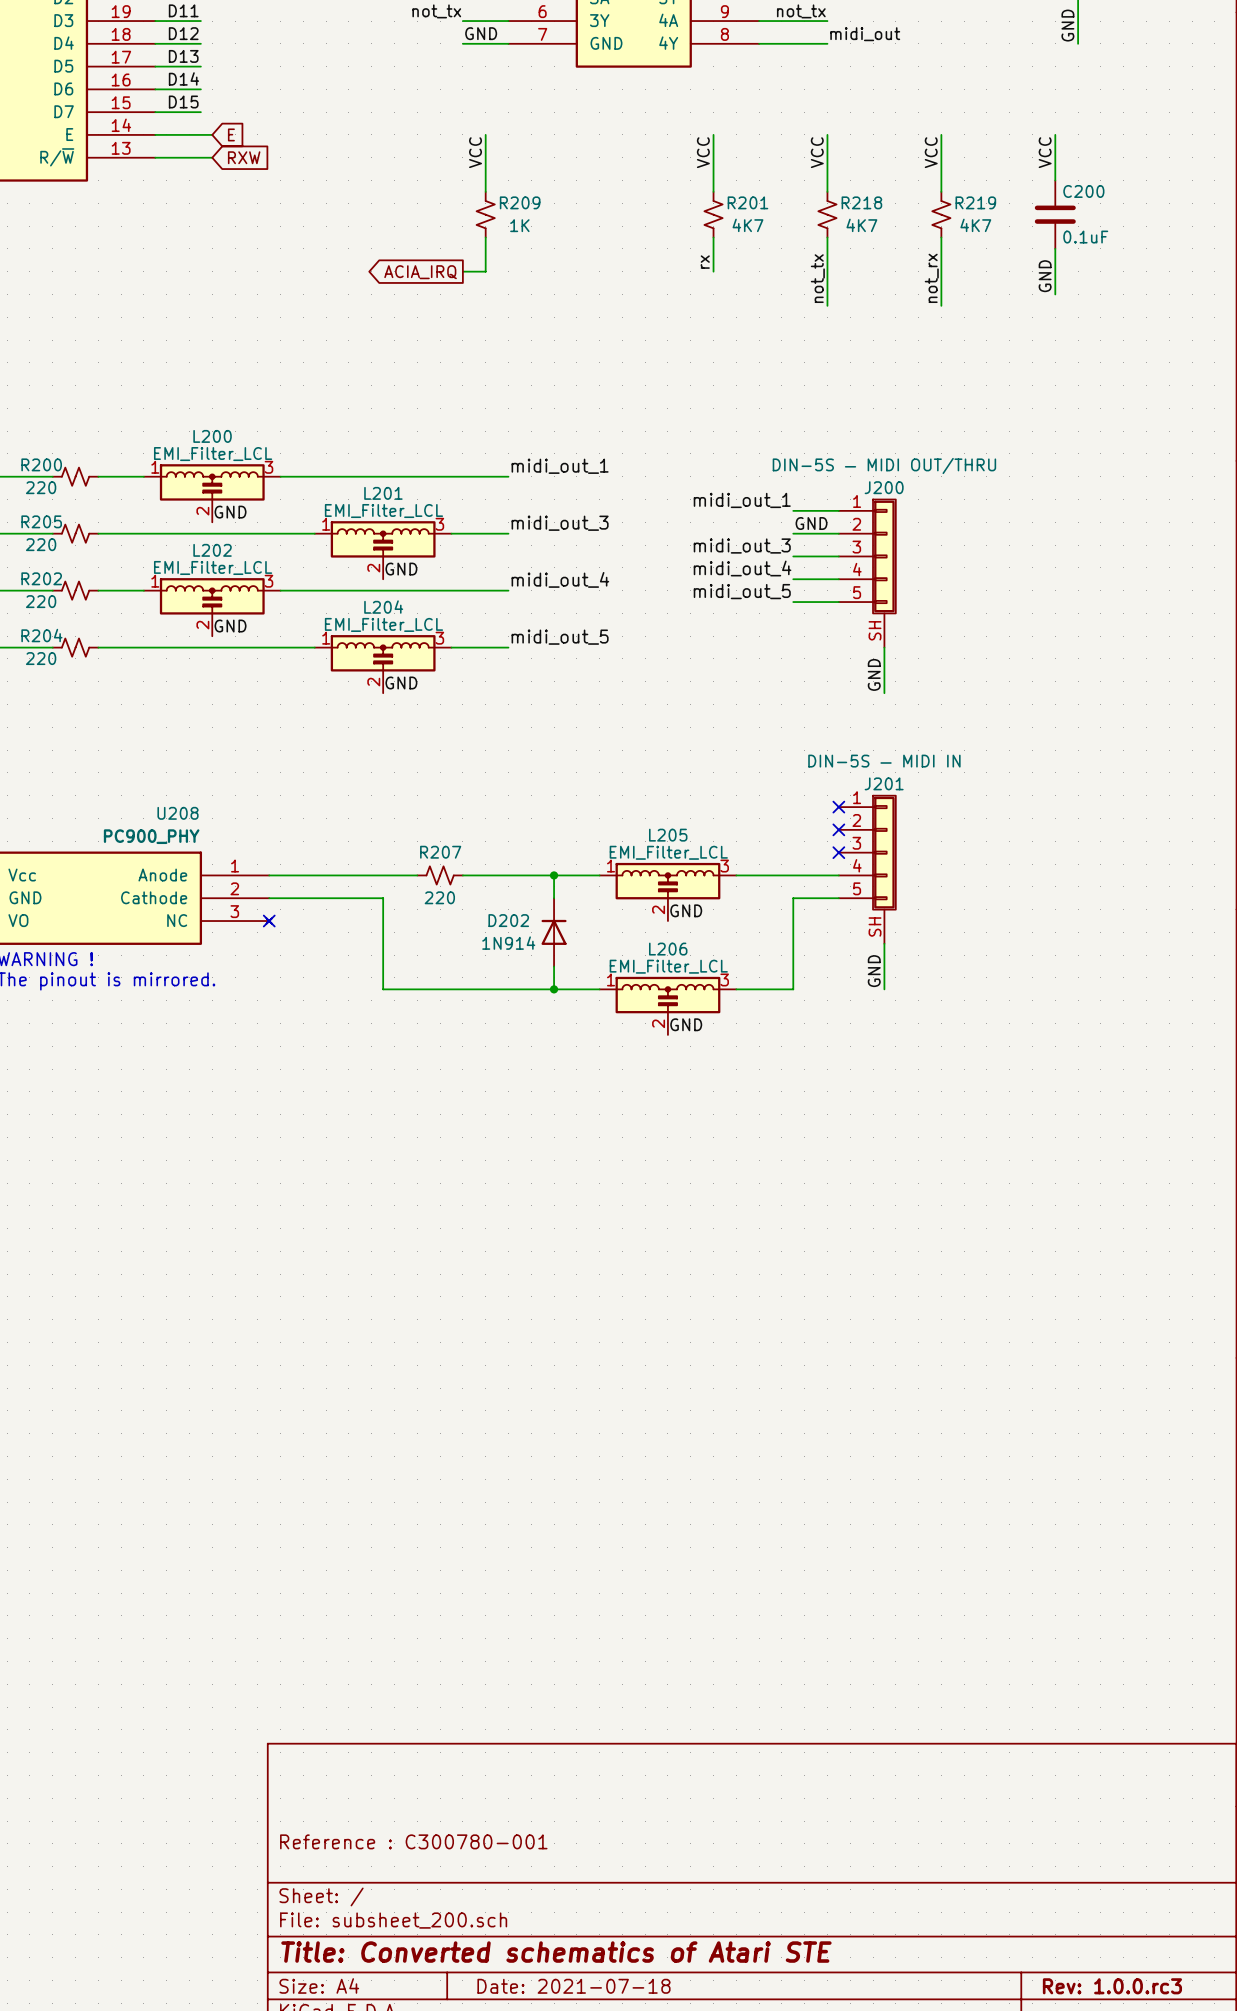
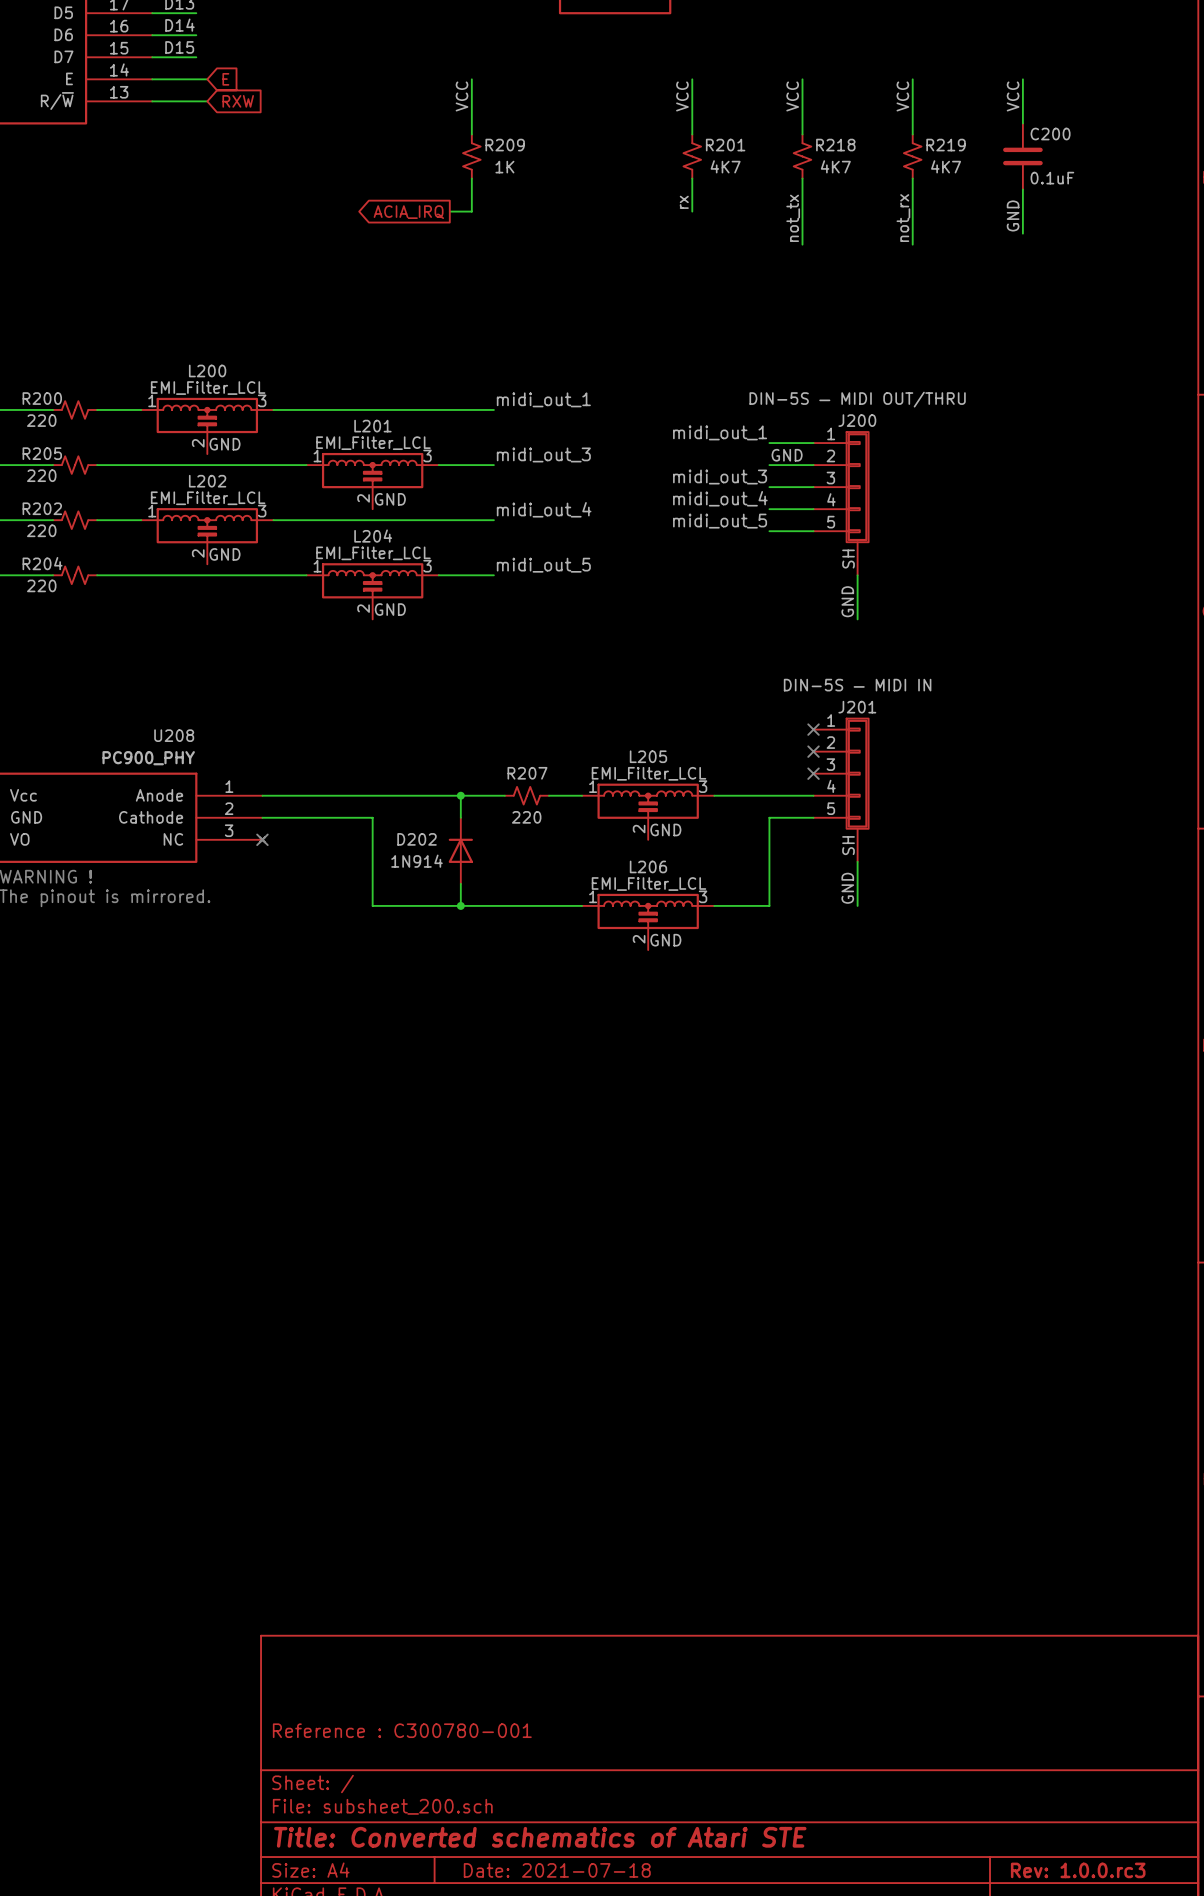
R207 position: (440, 875) -> (526, 795)
junction: none -> (460, 795)
wire: (554, 875) (554, 898) -> (460, 795) (460, 817)
junction: (554, 875) -> none
D202 position: (554, 932) -> (460, 850)
wire: (554, 966) (554, 989) -> (460, 883) (460, 905)
junction: none -> (460, 905)
junction: (554, 989) -> none

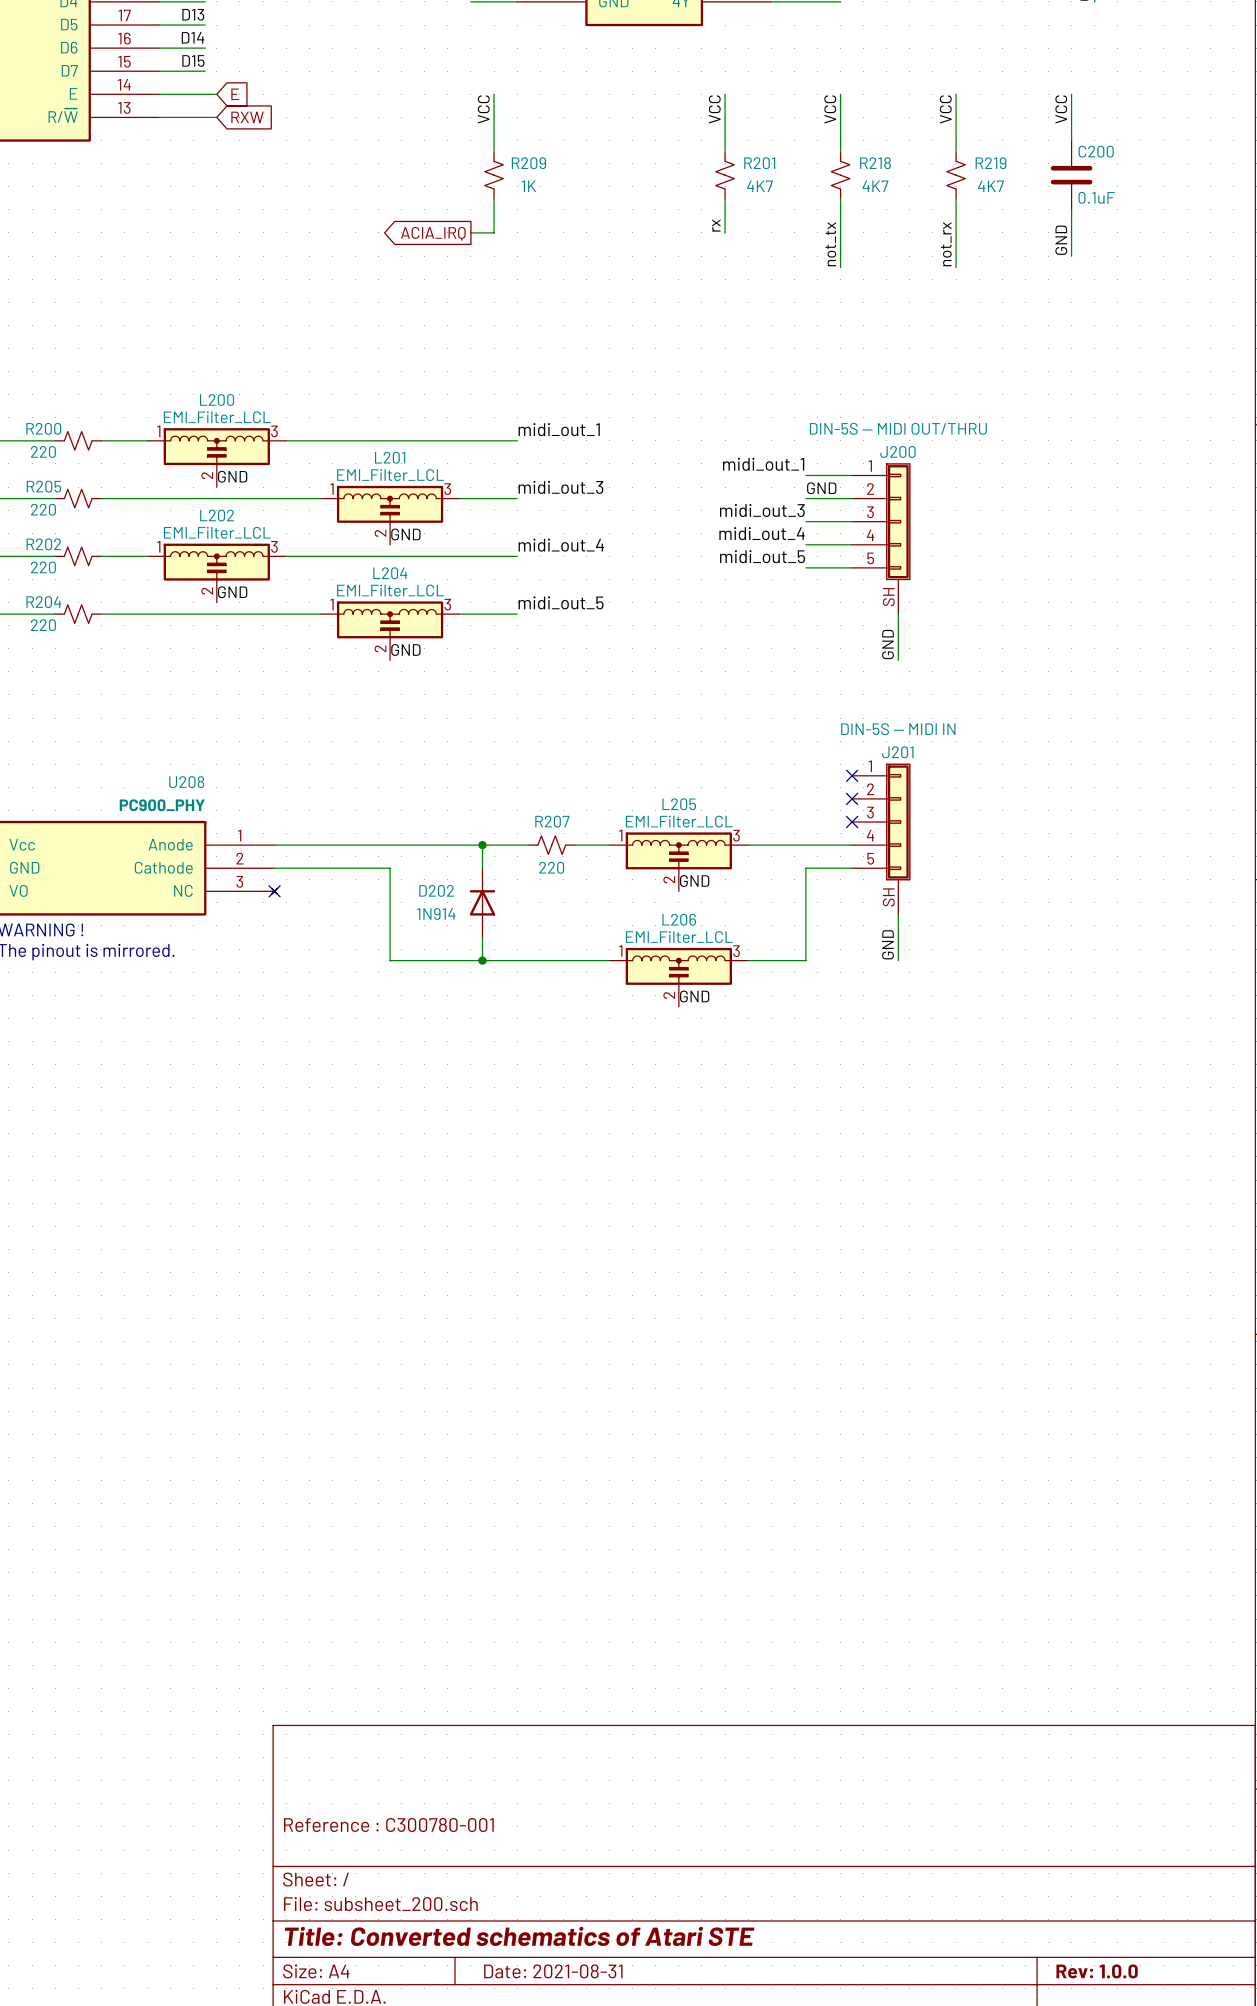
title block: Date: 2021-07-18 (557, 1870) -> Date: 2021-08-31 (553, 1971)
title block: Rev: 1.0.0.rc3 (1078, 1870) -> Rev: 1.0.0 (1097, 1971)

